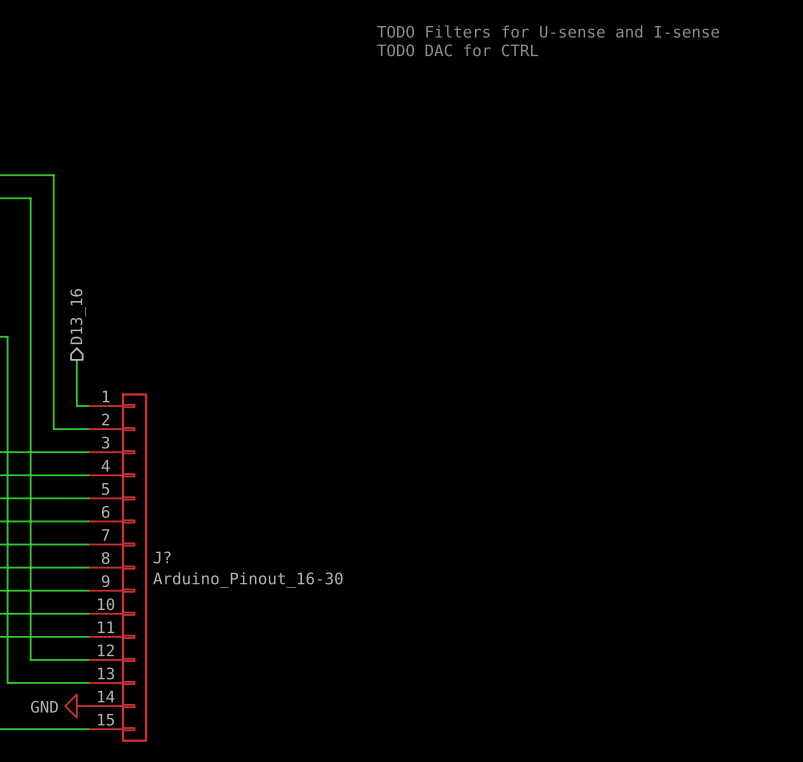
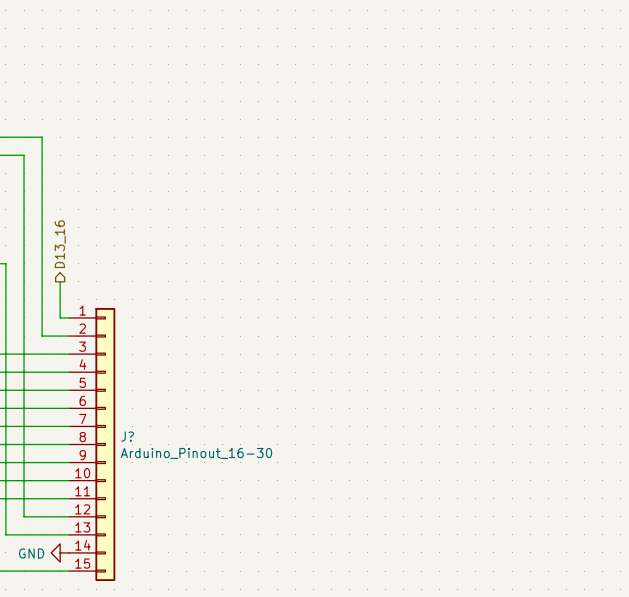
text: TODO Filters for U-sense and I-sense (548, 31) -> none
text: TODO DAC for CTRL (457, 50) -> none

